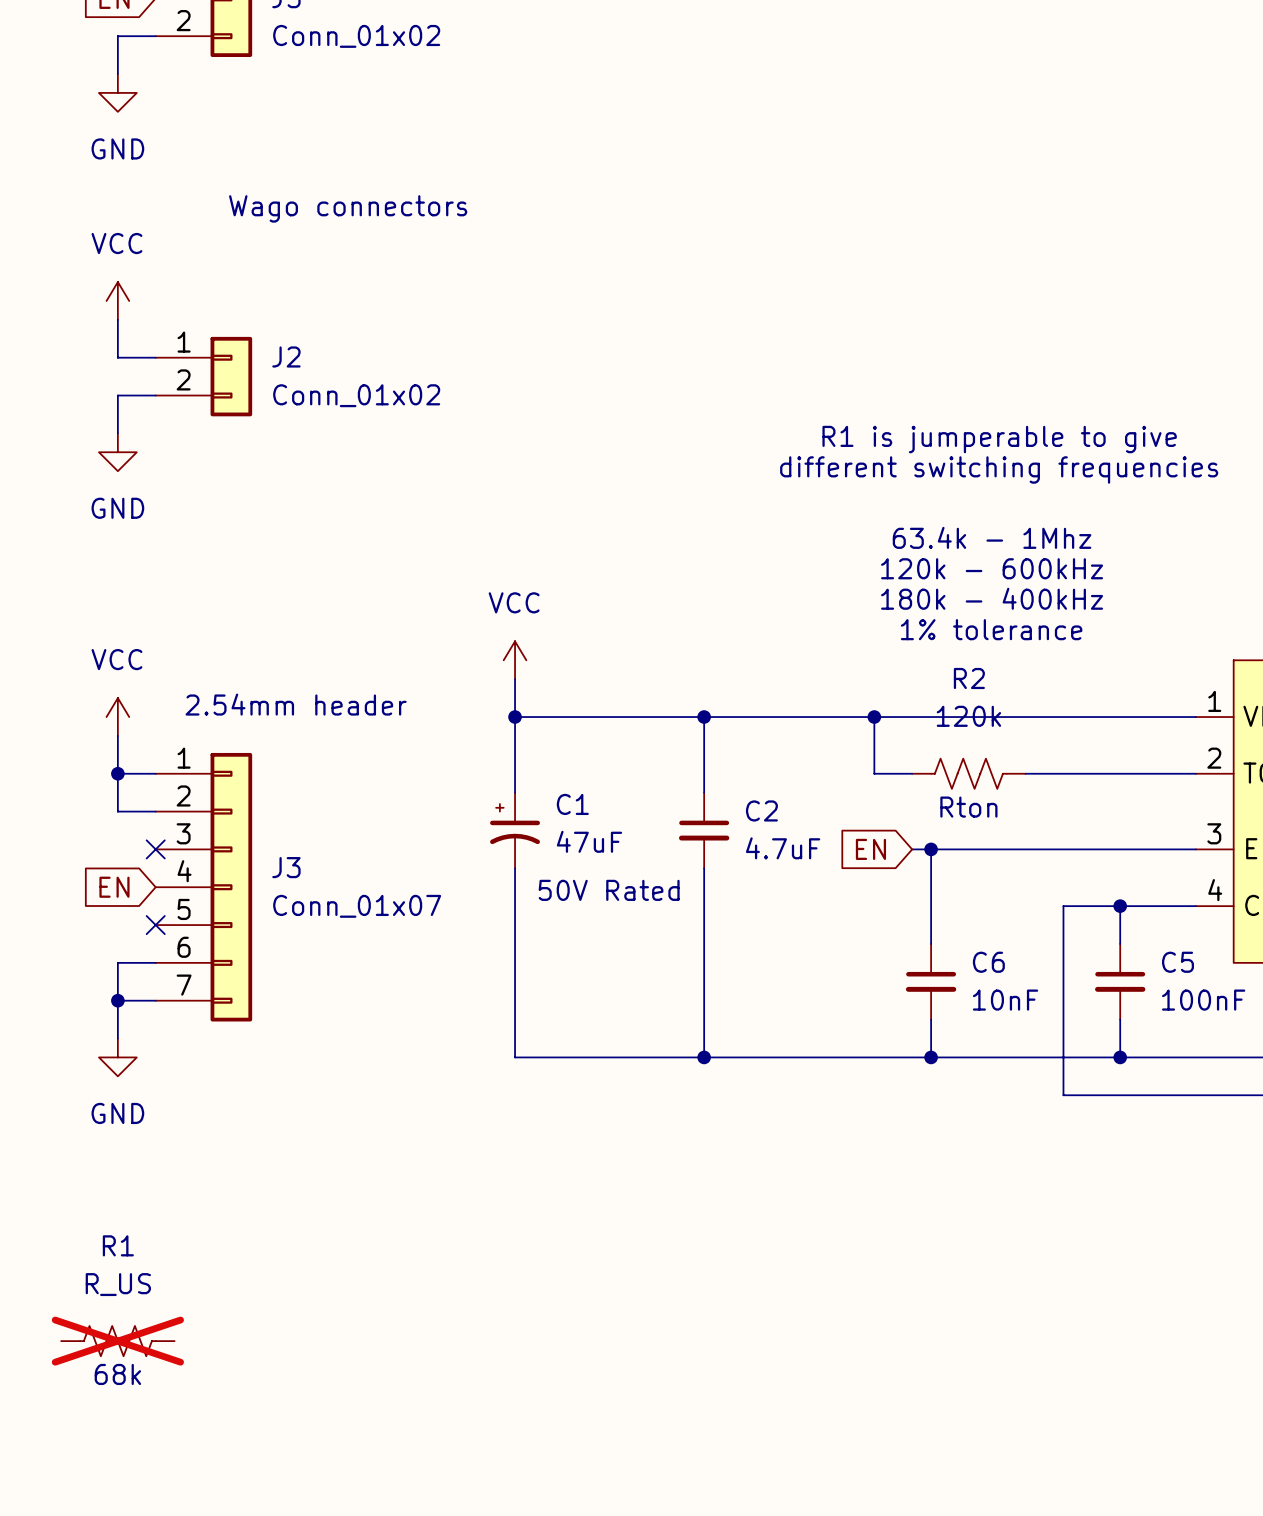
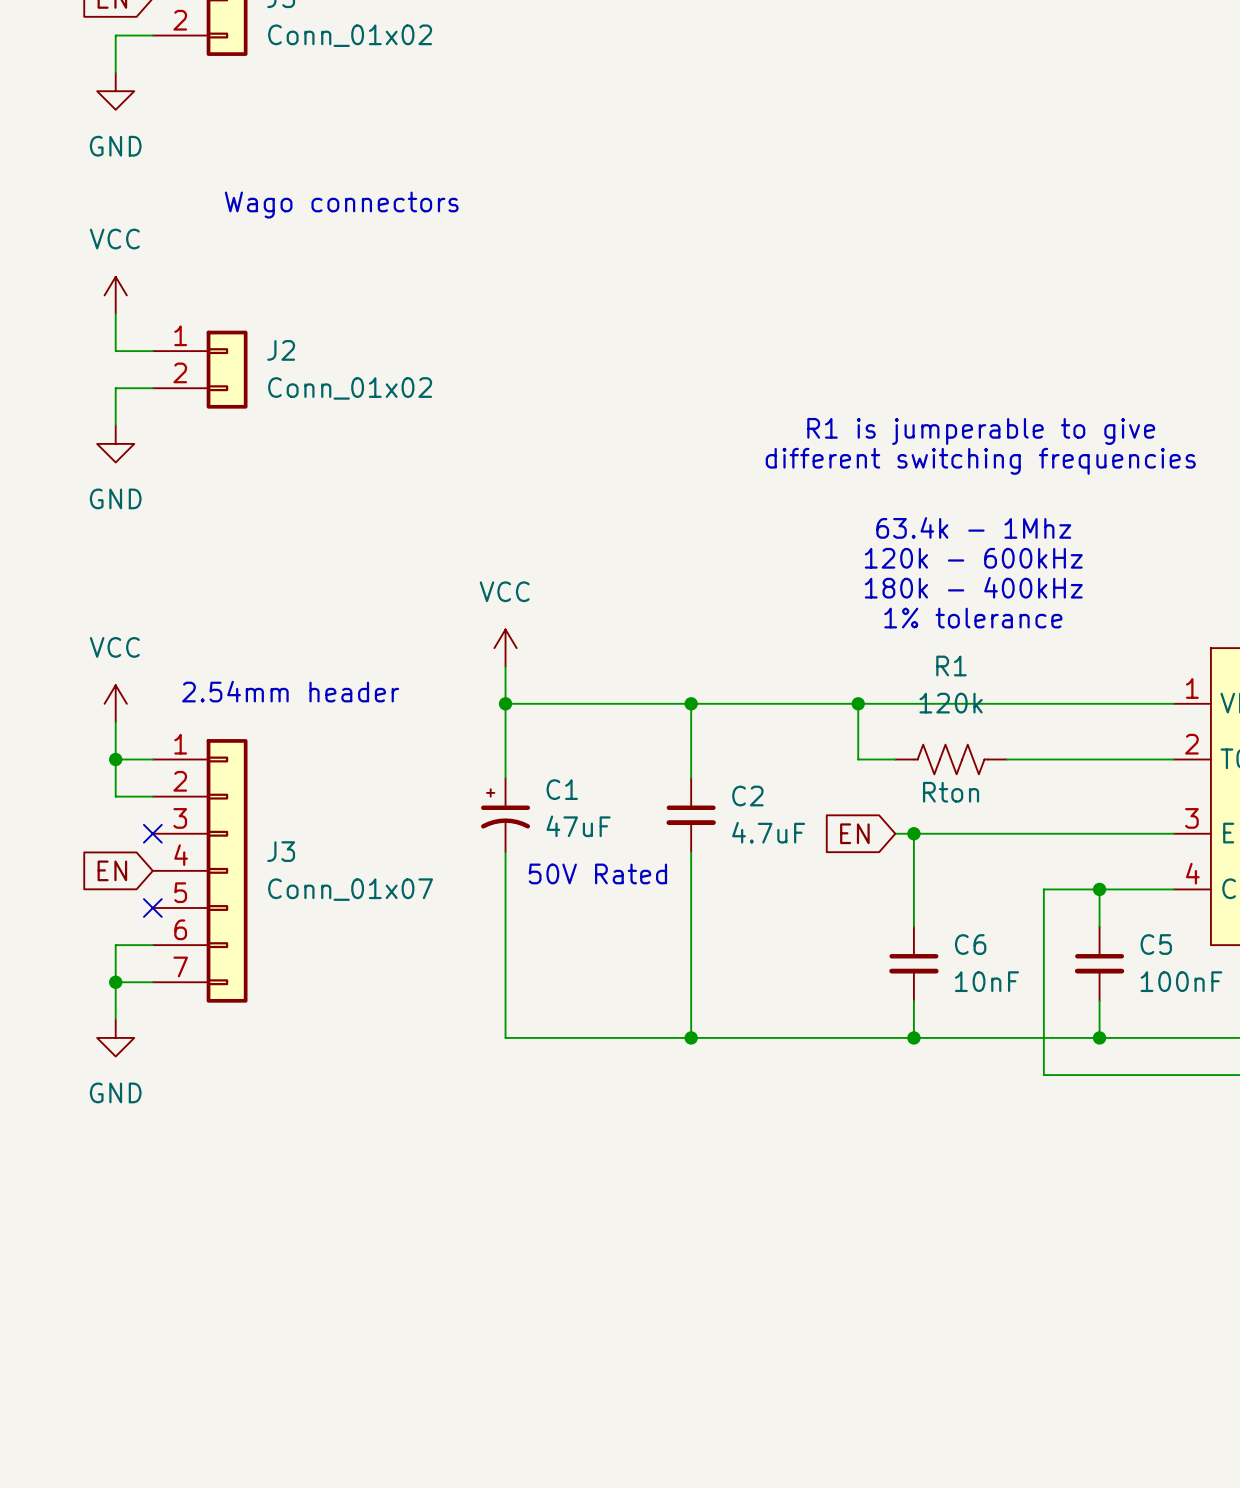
R2 name: R2 (969, 678) -> R1 (951, 665)
R1: R_US (117, 1341) -> none

